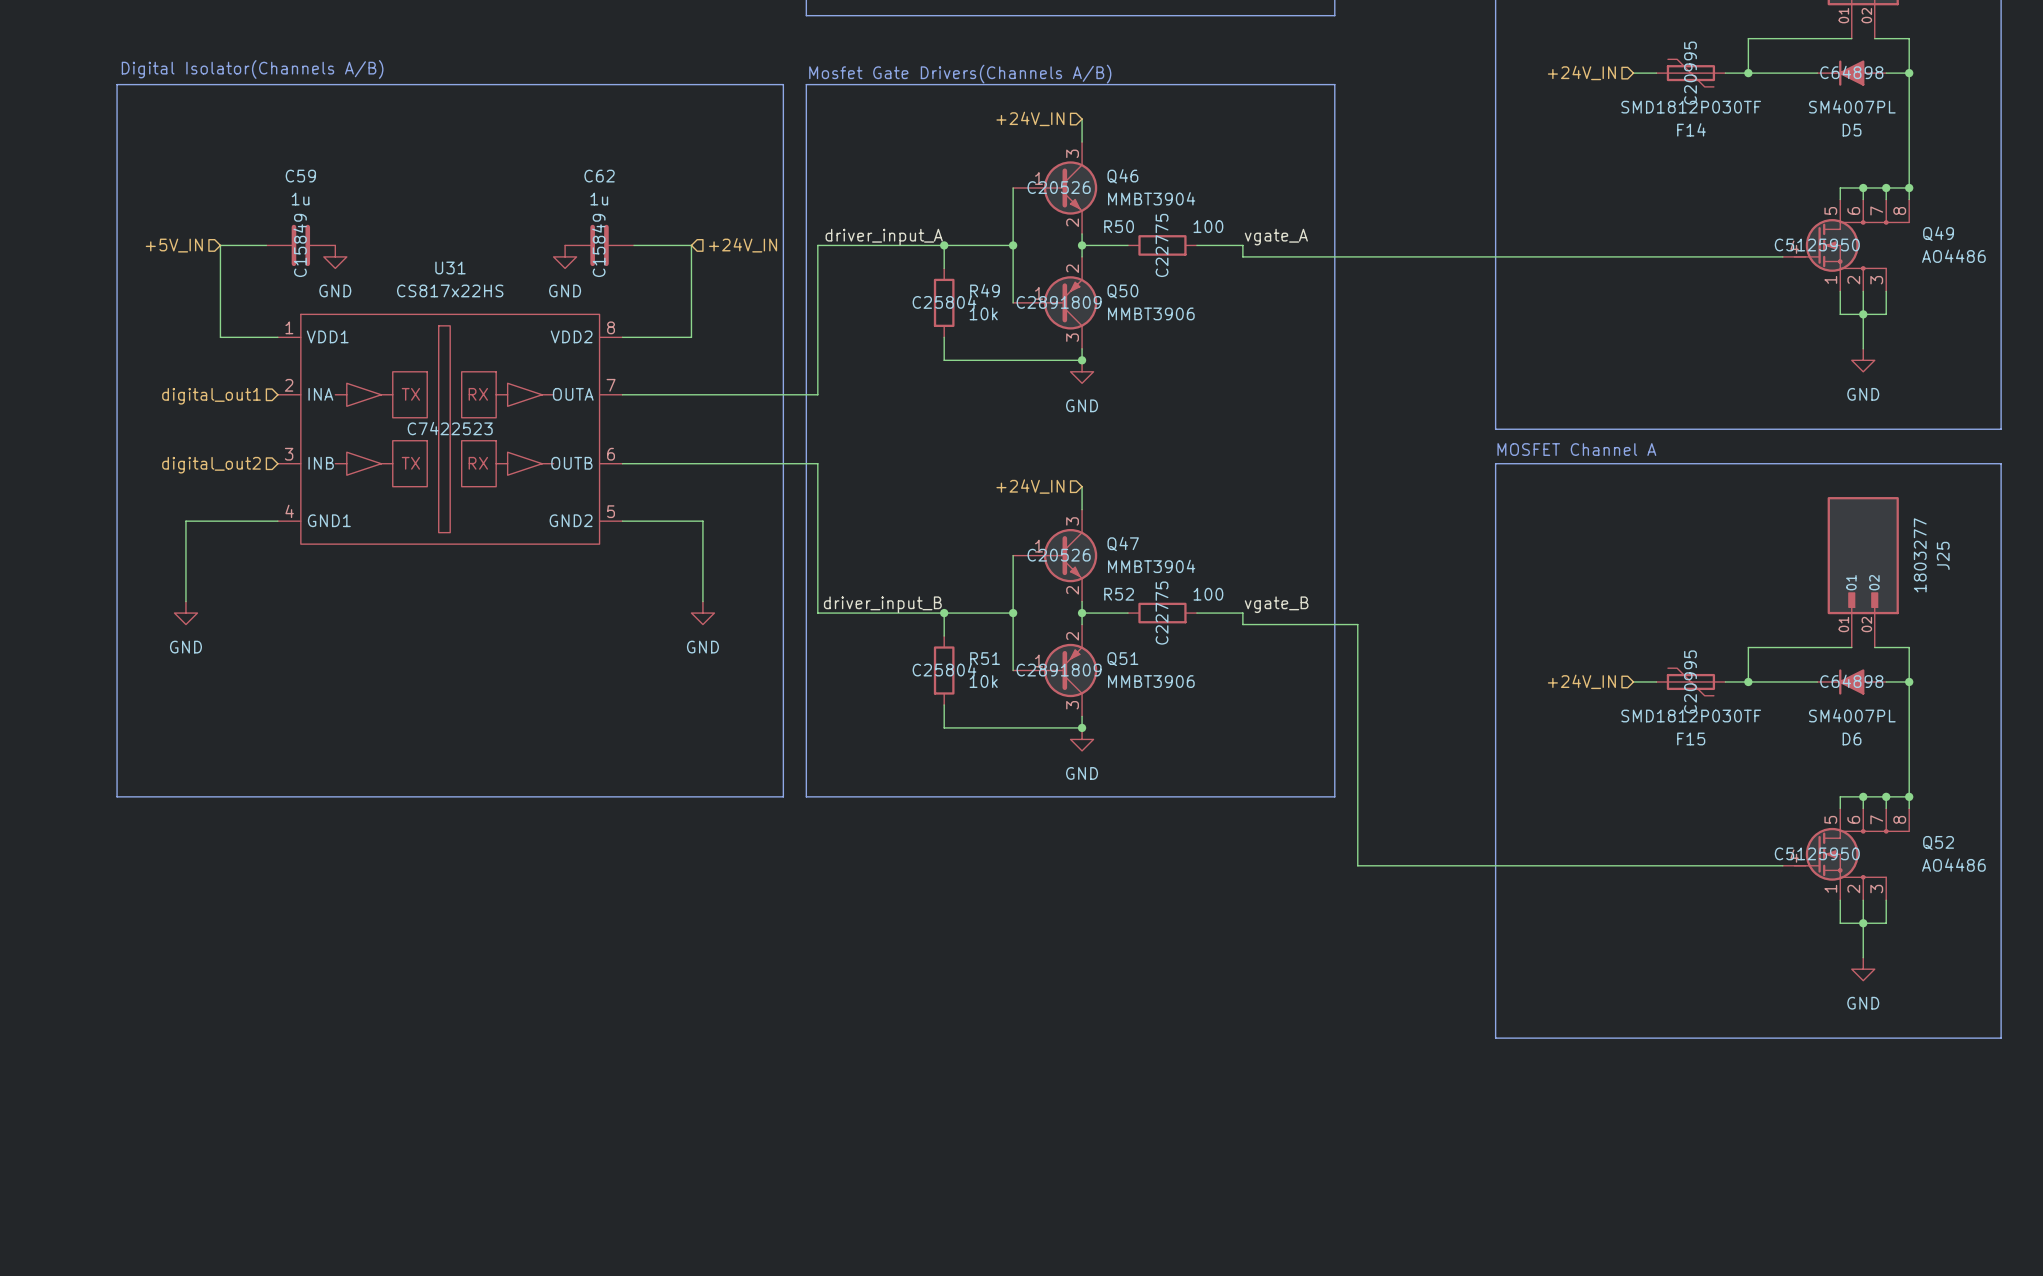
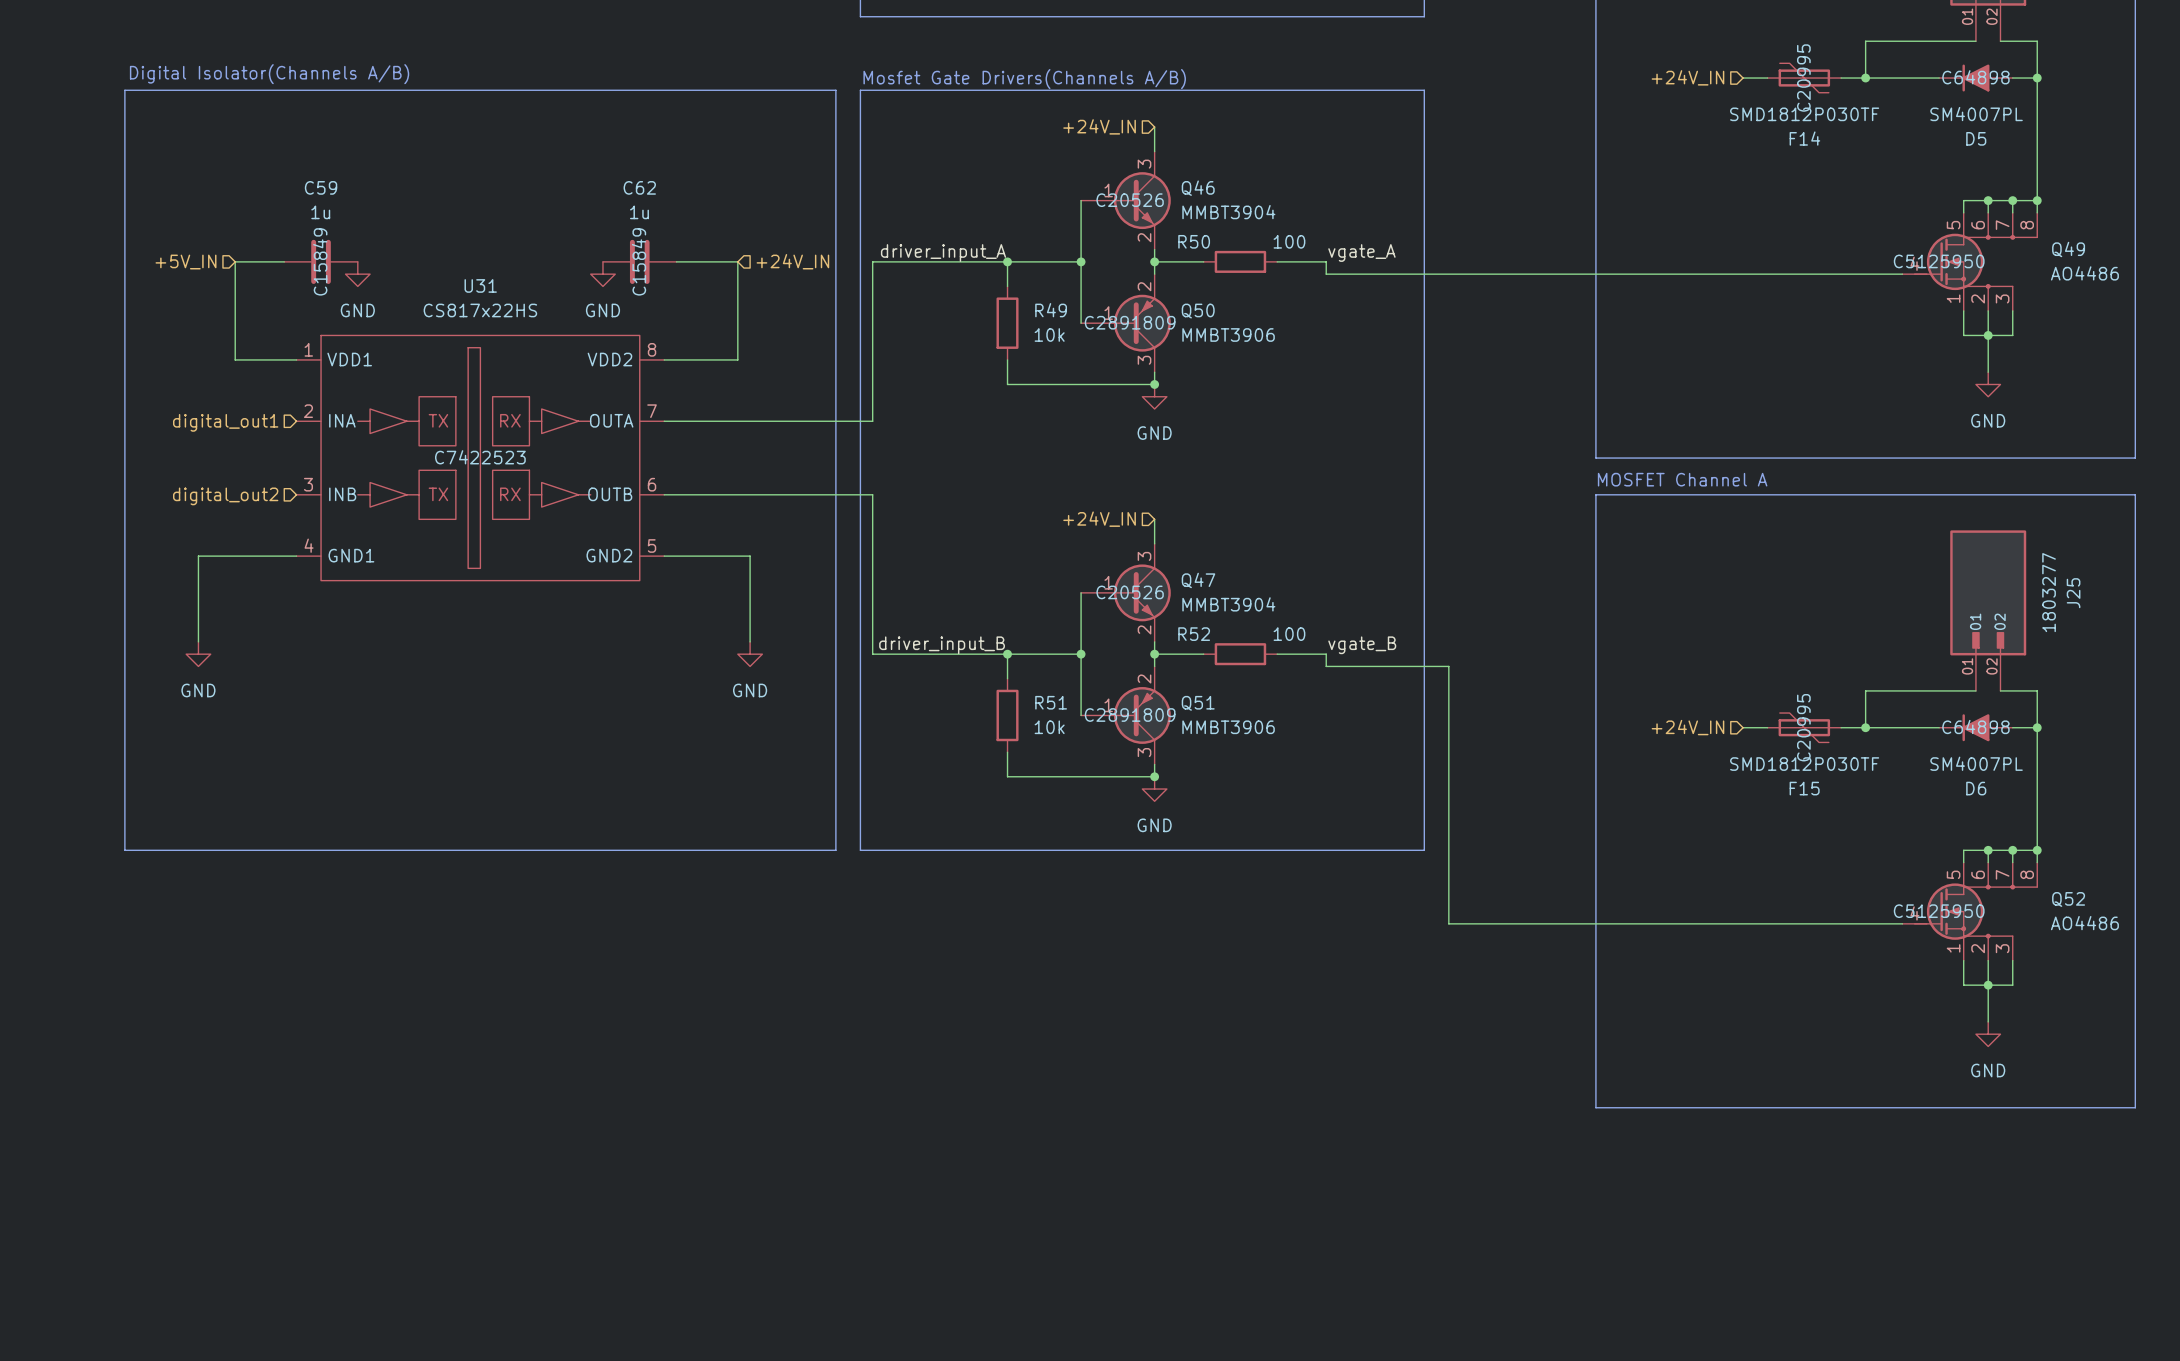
R50 text: C22775 (1162, 245) -> none
R49 text: C25804 (944, 302) -> none
R52 text: C22775 (1162, 613) -> none
R51 text: C25804 (944, 669) -> none

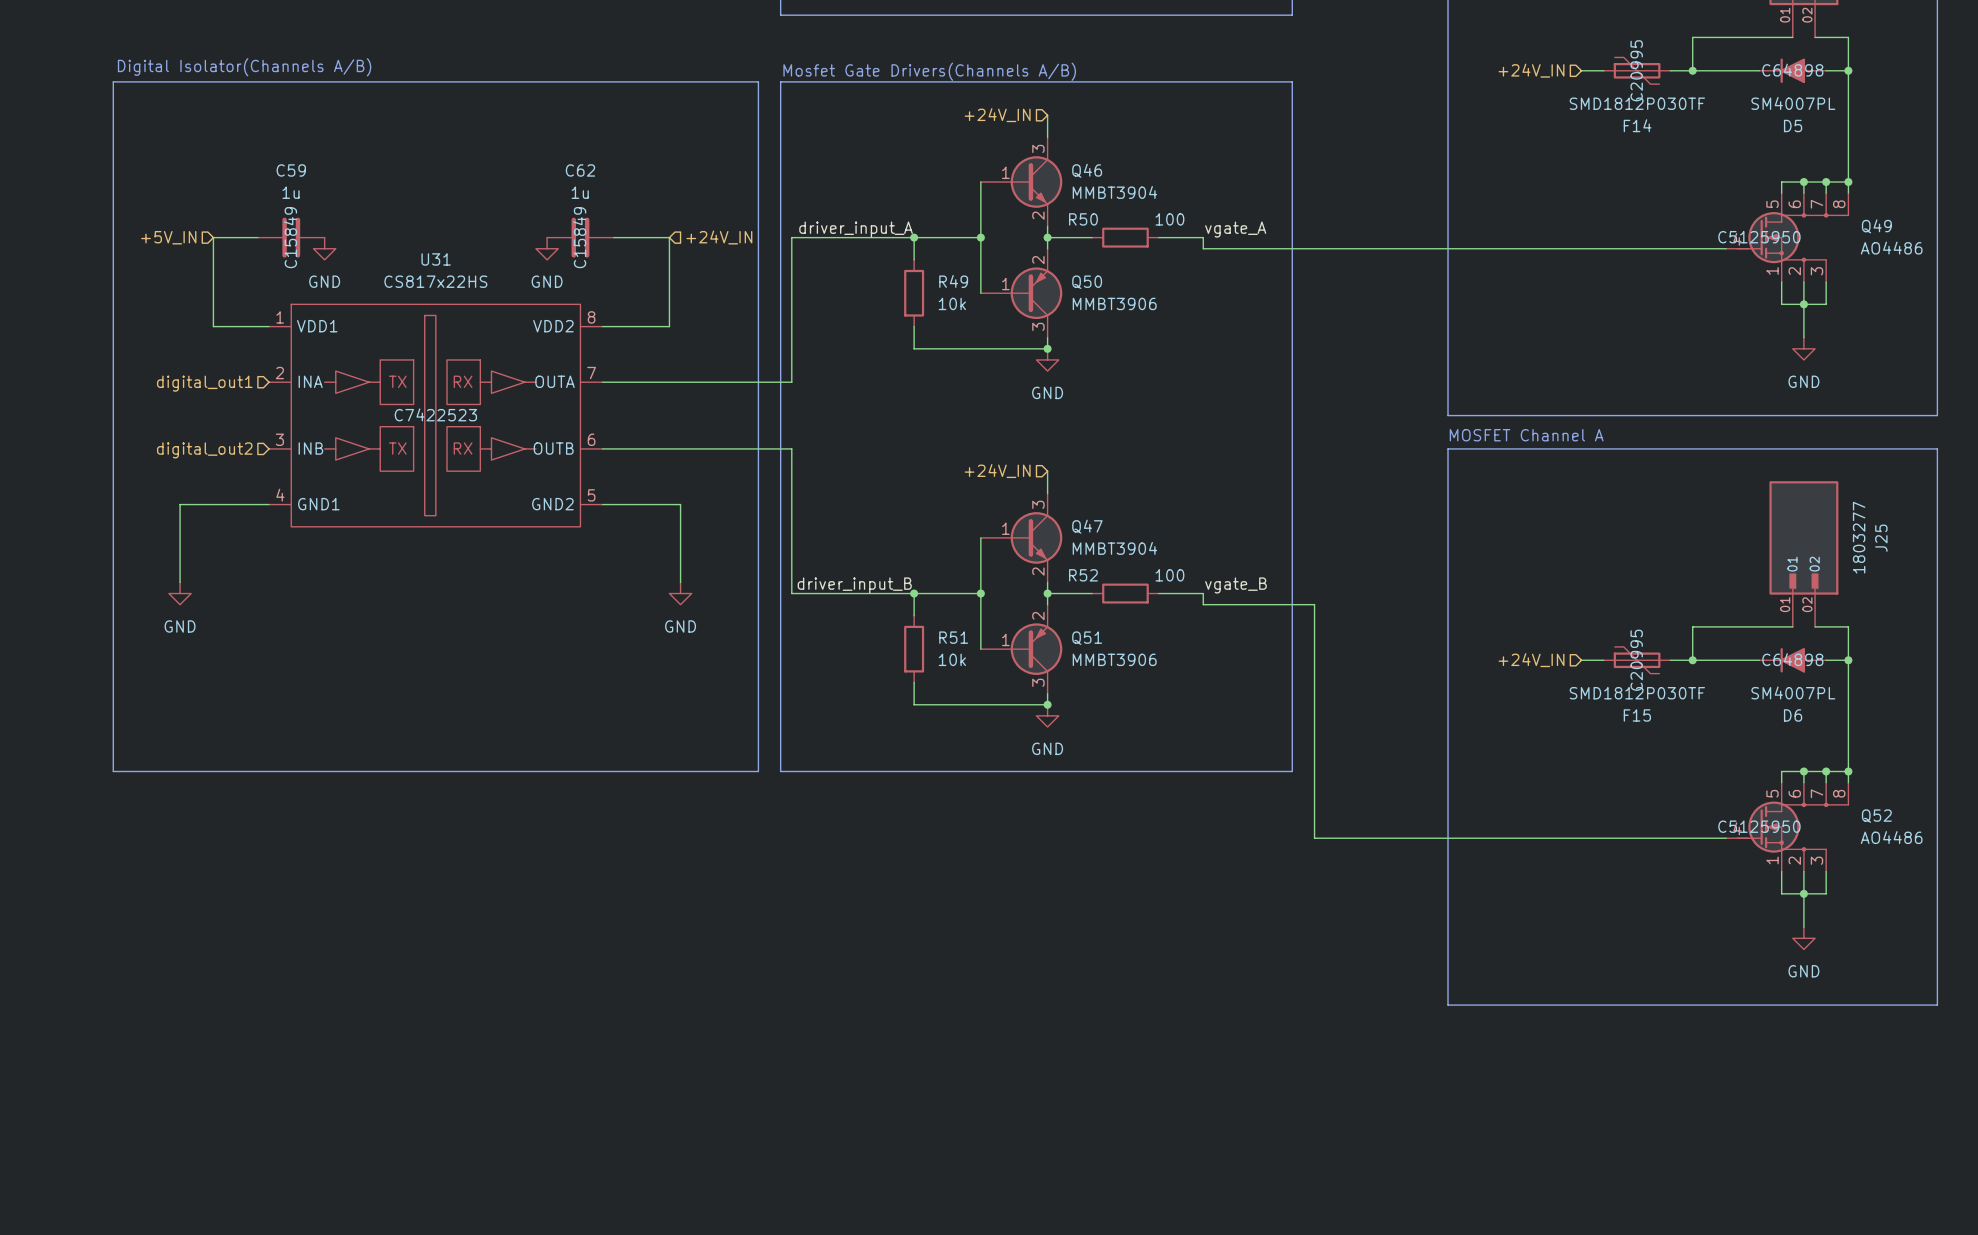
Q46 text: C20526 (1130, 200) -> none
Q50 text: C2891809 (1130, 322) -> none
Q47 text: C20526 (1130, 592) -> none
Q51 text: C2891809 (1130, 715) -> none

